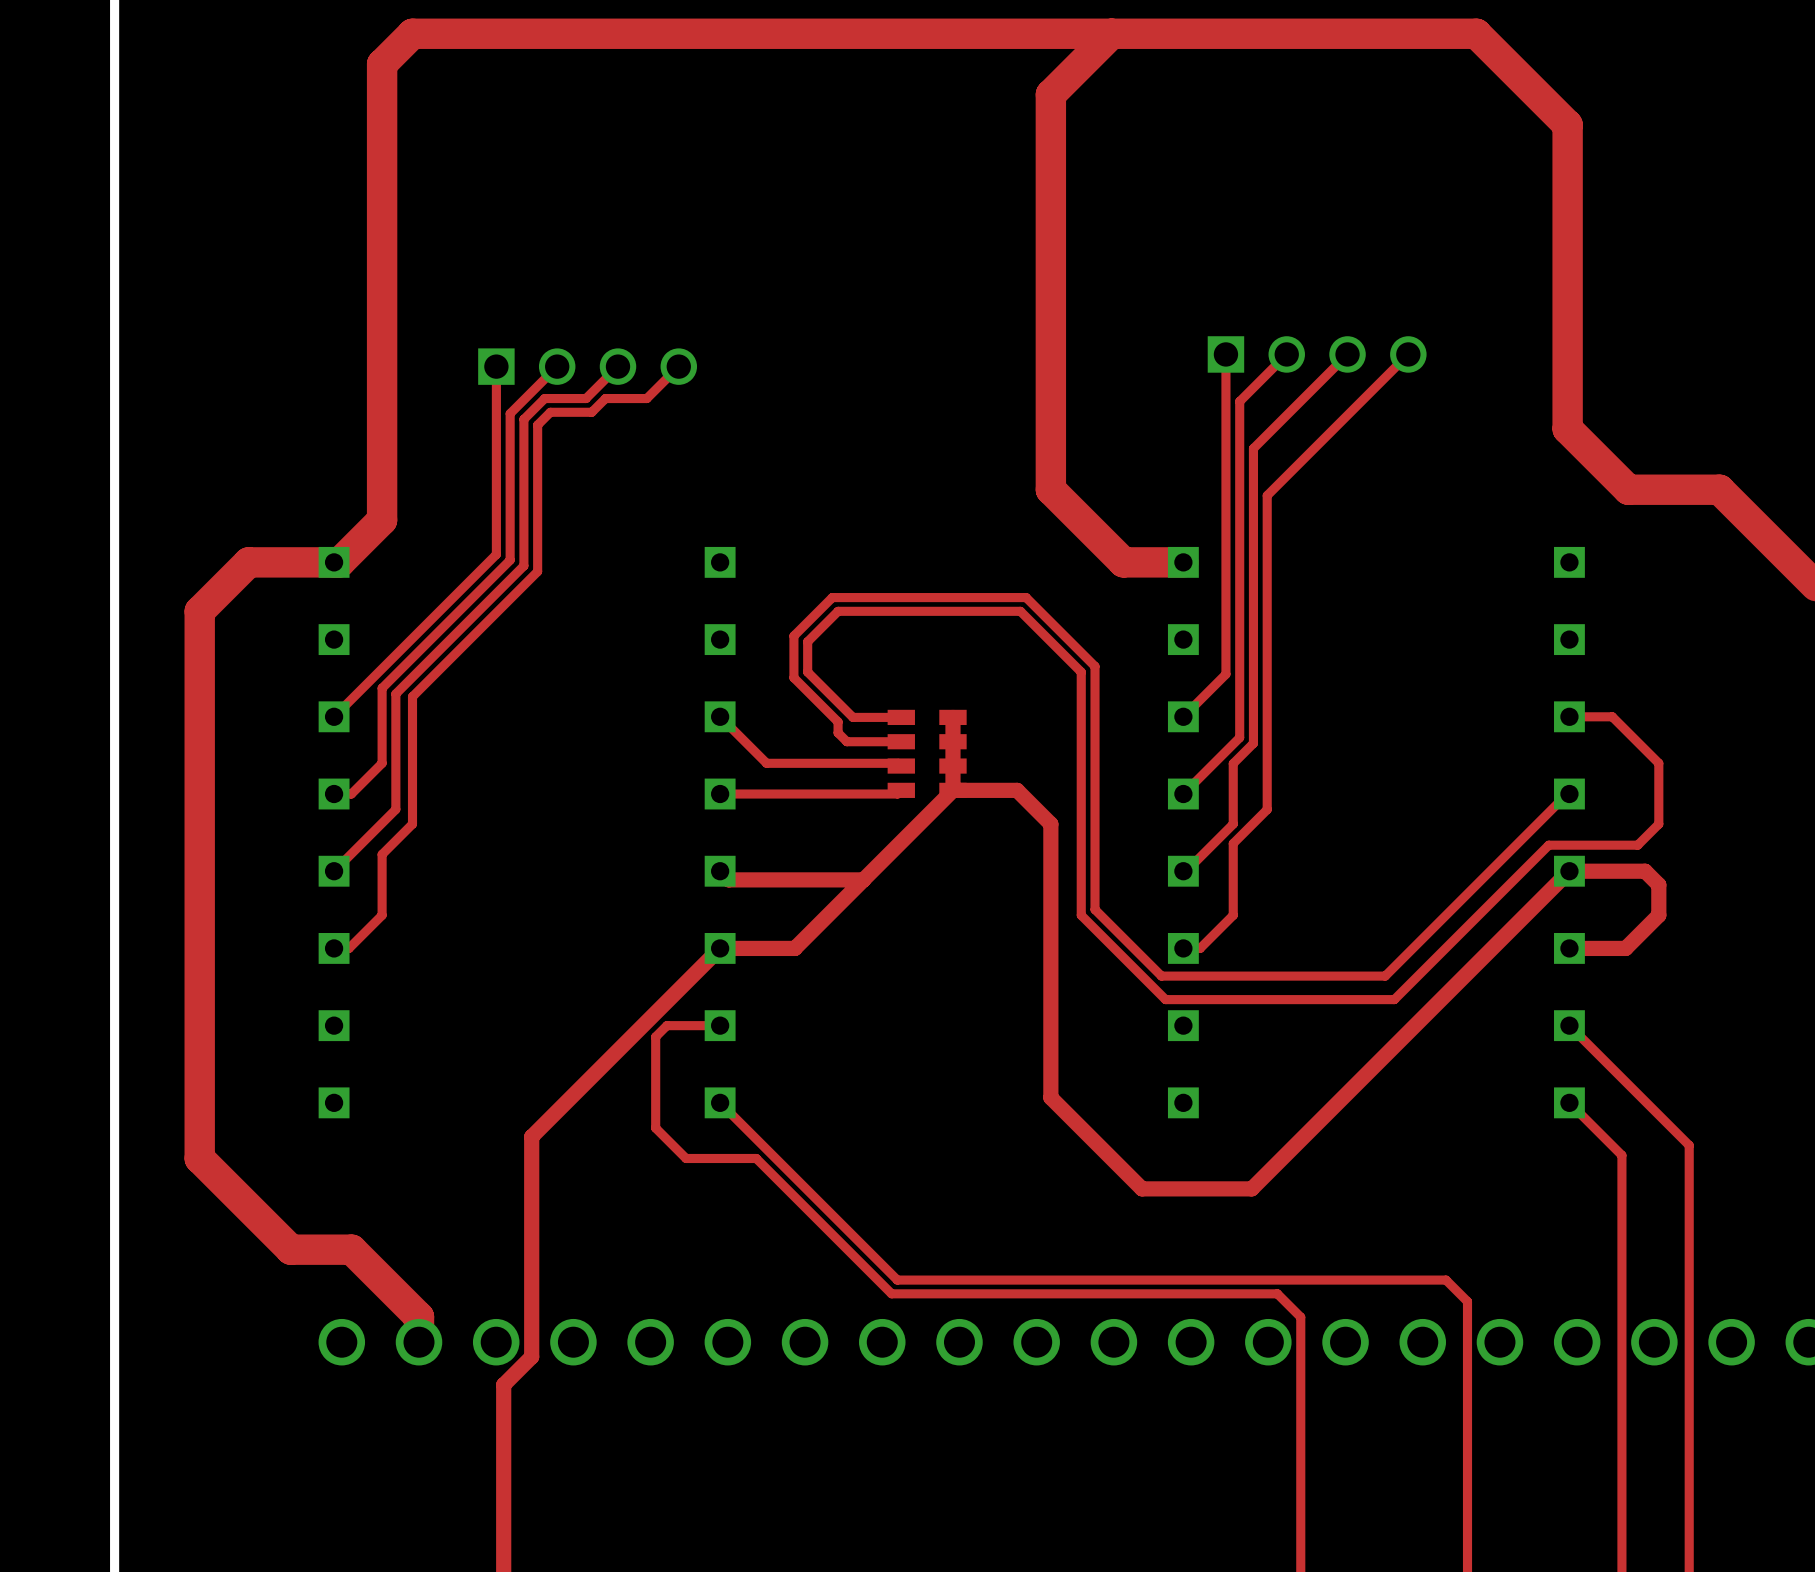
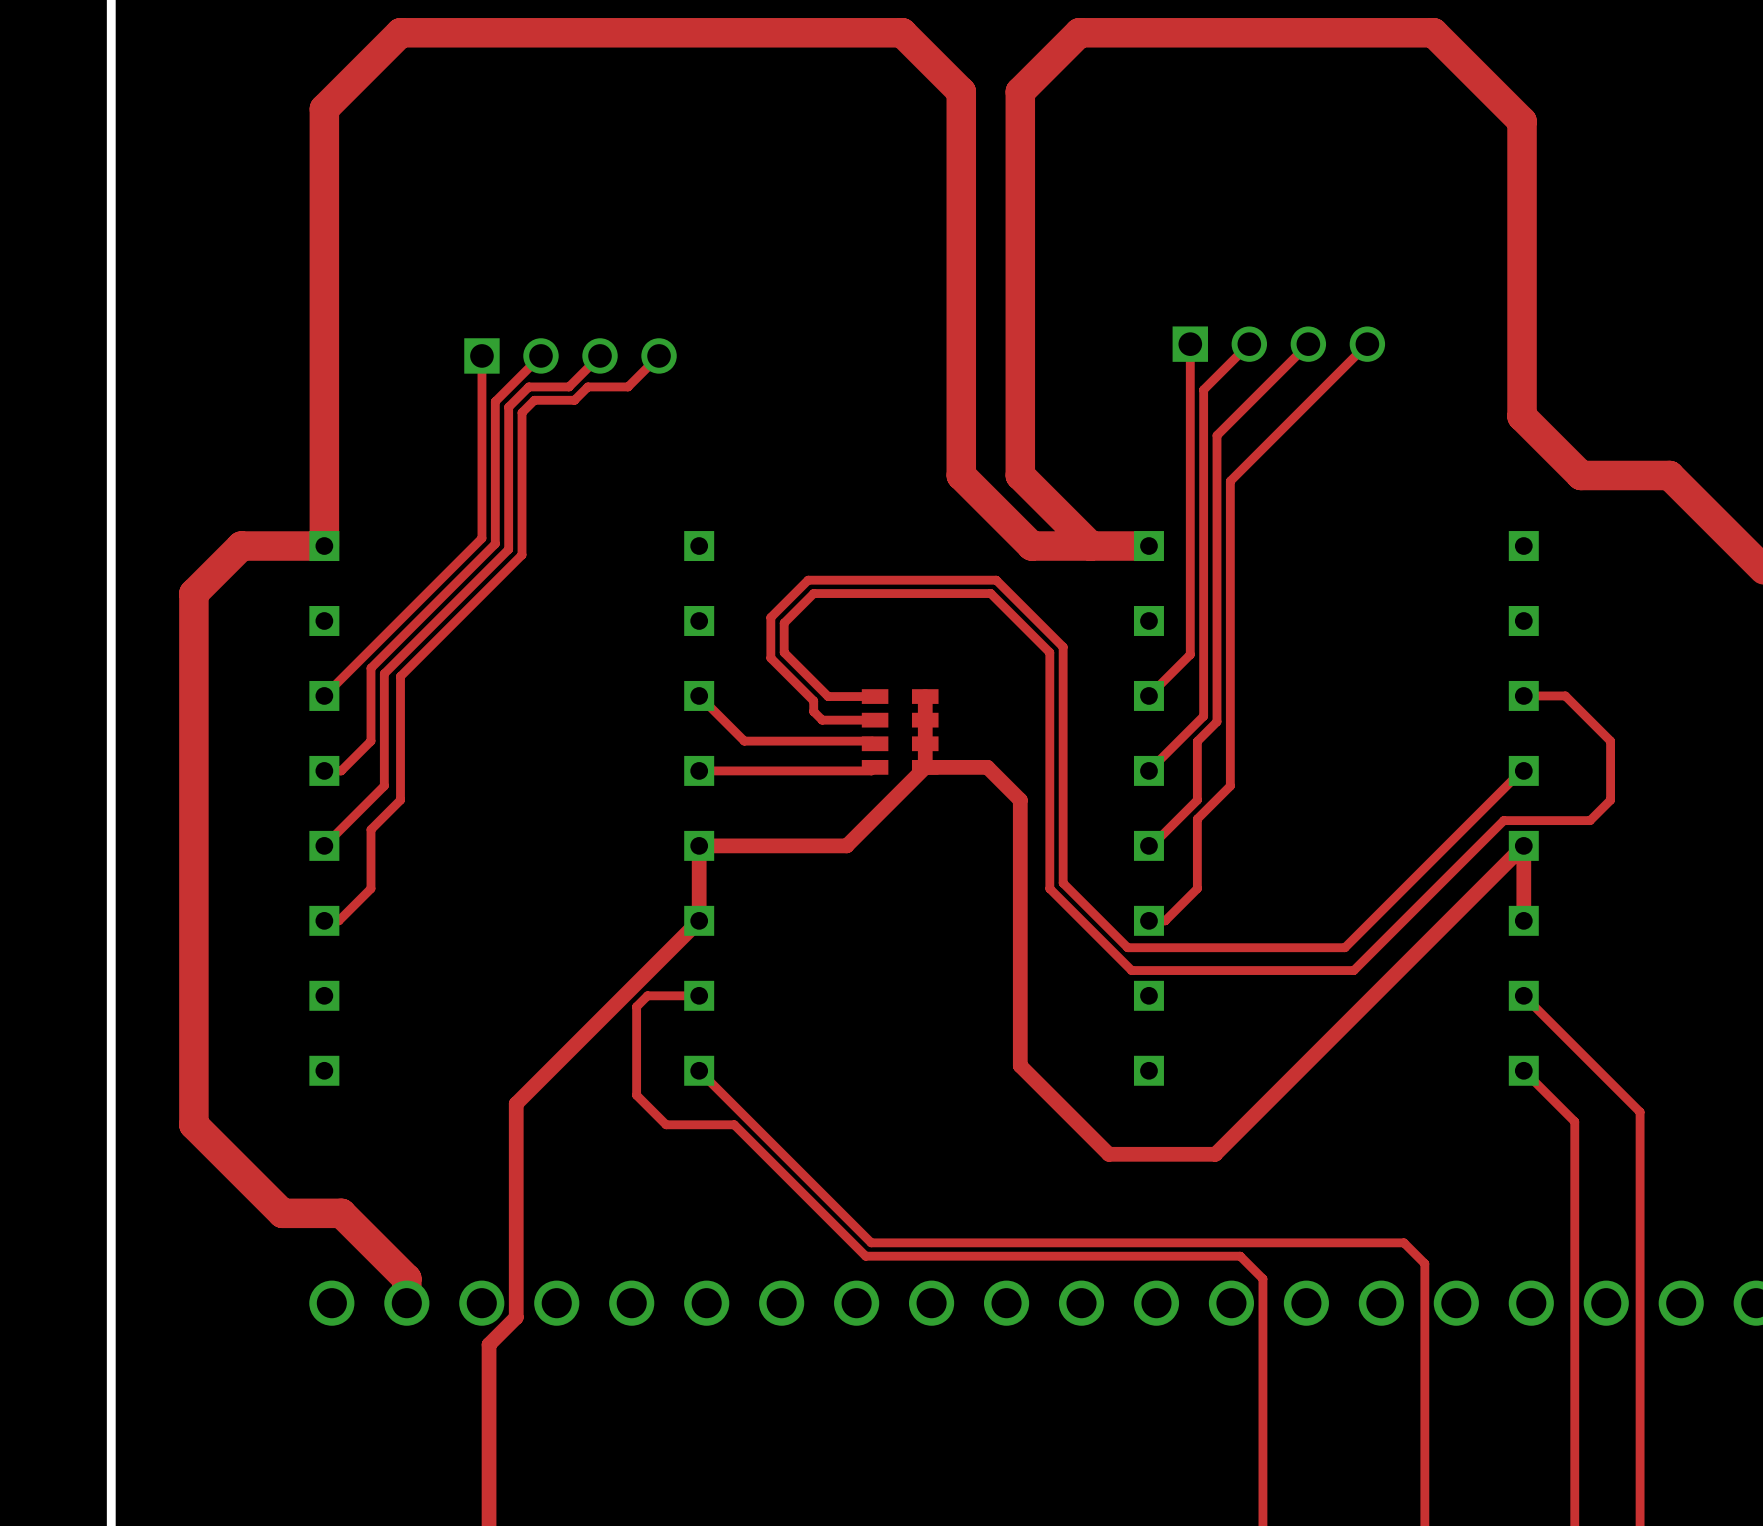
top track: (1111, 33) (929, 33) -> (1090, 546) (1031, 546) (961, 475) (961, 91) (902, 32)
top track: (382, 64) (382, 520) (339, 562) (334, 562) -> (370, 62) (324, 108) (324, 546)
top track: (720, 871) (728, 879) (863, 879) -> none
top track: (872, 871) (794, 948) (720, 948) -> (846, 845) (699, 845) (699, 920)
top track: (1569, 871) (1645, 871) (1658, 884) (1658, 915) (1625, 948) (1569, 948) -> (1523, 845) (1523, 920)

